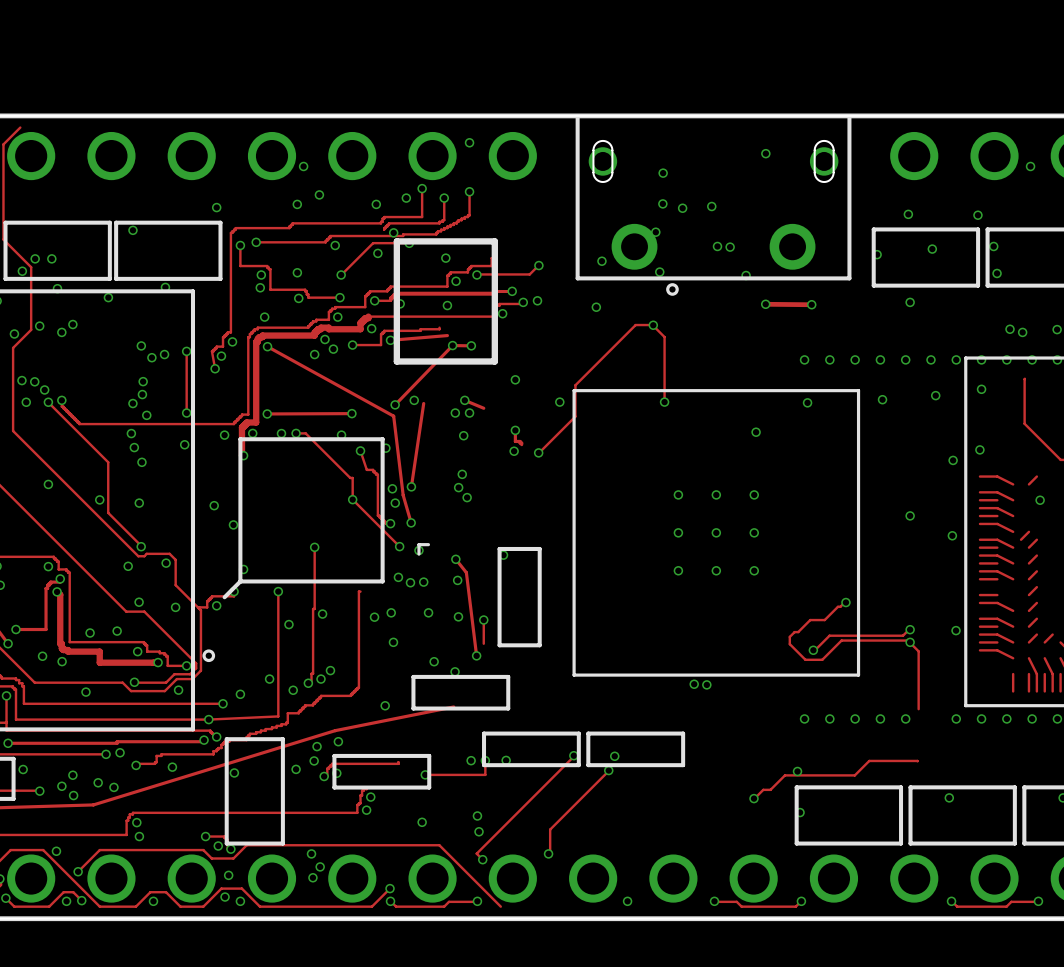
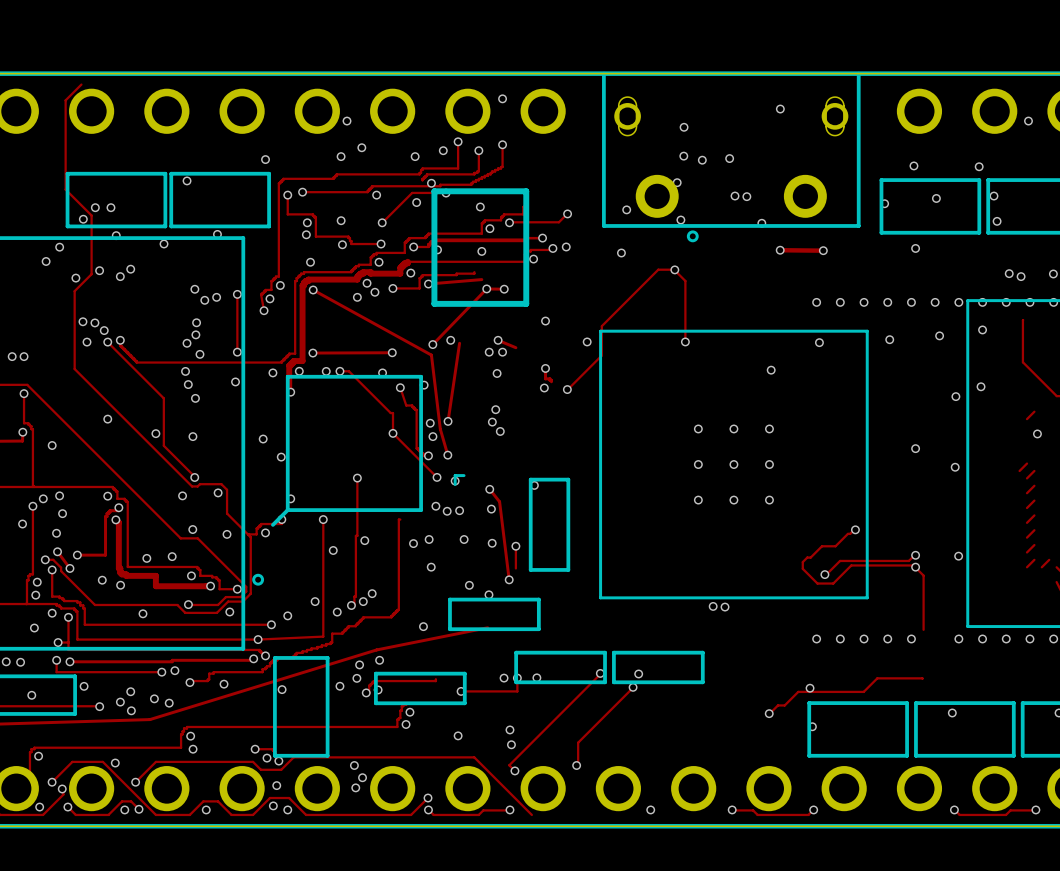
track: (979, 476) (997, 476) (1013, 484) -> none
track: (979, 492) (997, 492) (1013, 500) -> none
track: (979, 500) (997, 500) -> none
track: (979, 508) (997, 508) (1013, 516) -> none
track: (979, 516) (997, 516) -> none
track: (979, 523) (997, 523) (1013, 531) -> none
track: (979, 539) (997, 539) (1013, 547) -> none
track: (979, 547) (997, 547) -> none
track: (979, 555) (997, 555) (1013, 563) -> none
track: (979, 563) (997, 563) -> none
track: (979, 571) (997, 571) (1013, 579) -> none
track: (979, 579) (997, 579) -> none
track: (979, 595) (997, 595) -> none
track: (979, 602) (997, 602) (1013, 610) -> none
track: (979, 618) (997, 618) (1013, 626) -> none
track: (979, 626) (997, 626) -> none
track: (979, 634) (997, 634) (1013, 642) -> none
track: (979, 642) (997, 642) -> none
track: (979, 650) (997, 650) (1013, 658) -> none
track: (1028, 658) (1036, 674) (1036, 691) -> none
track: (1044, 658) (1052, 674) (1052, 691) -> none
track: (1013, 674) (1013, 691) -> none
track: (1028, 674) (1028, 691) -> none
track: (1044, 674) (1044, 691) -> none
track: (1060, 674) (1060, 691) -> none

